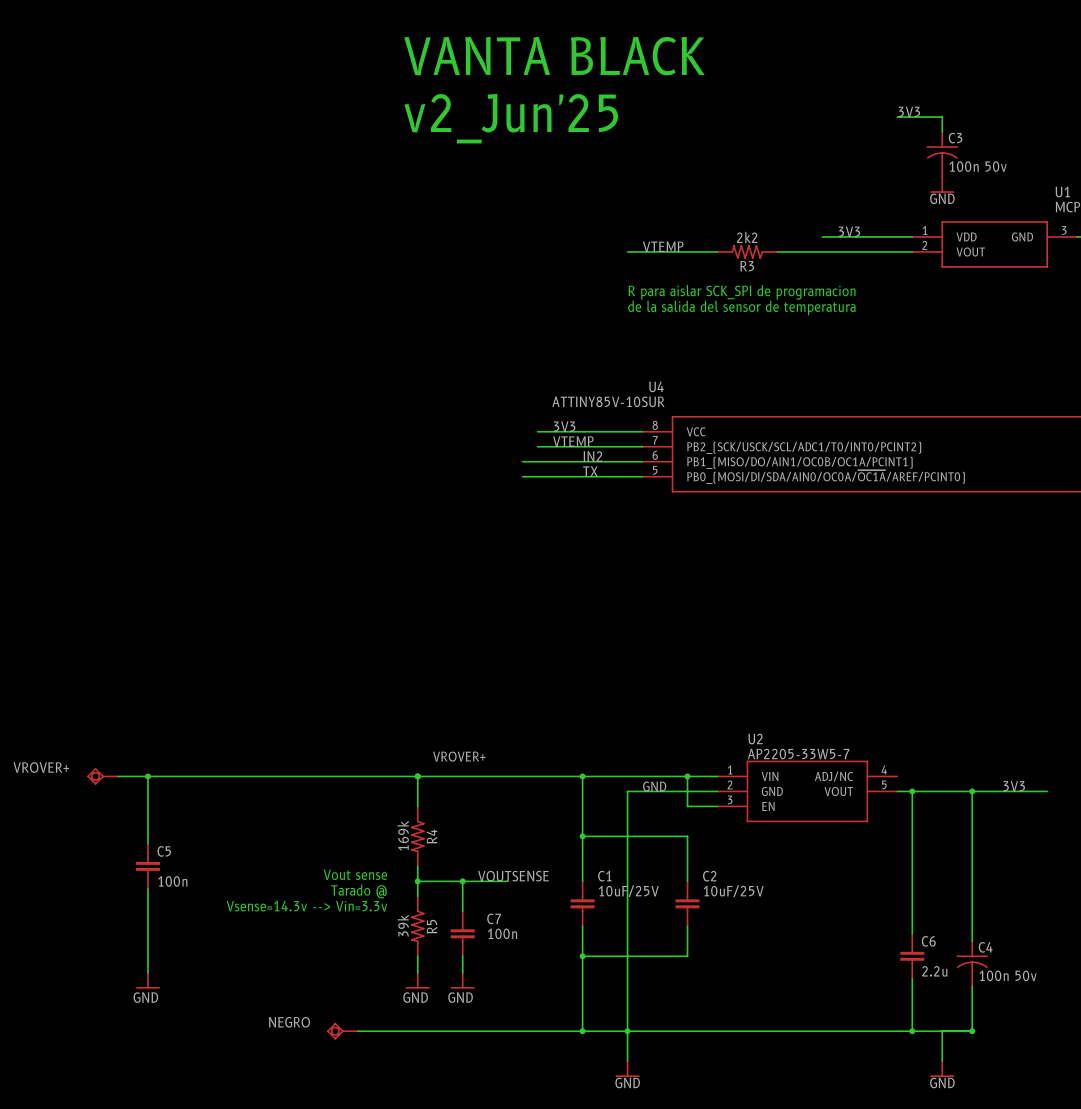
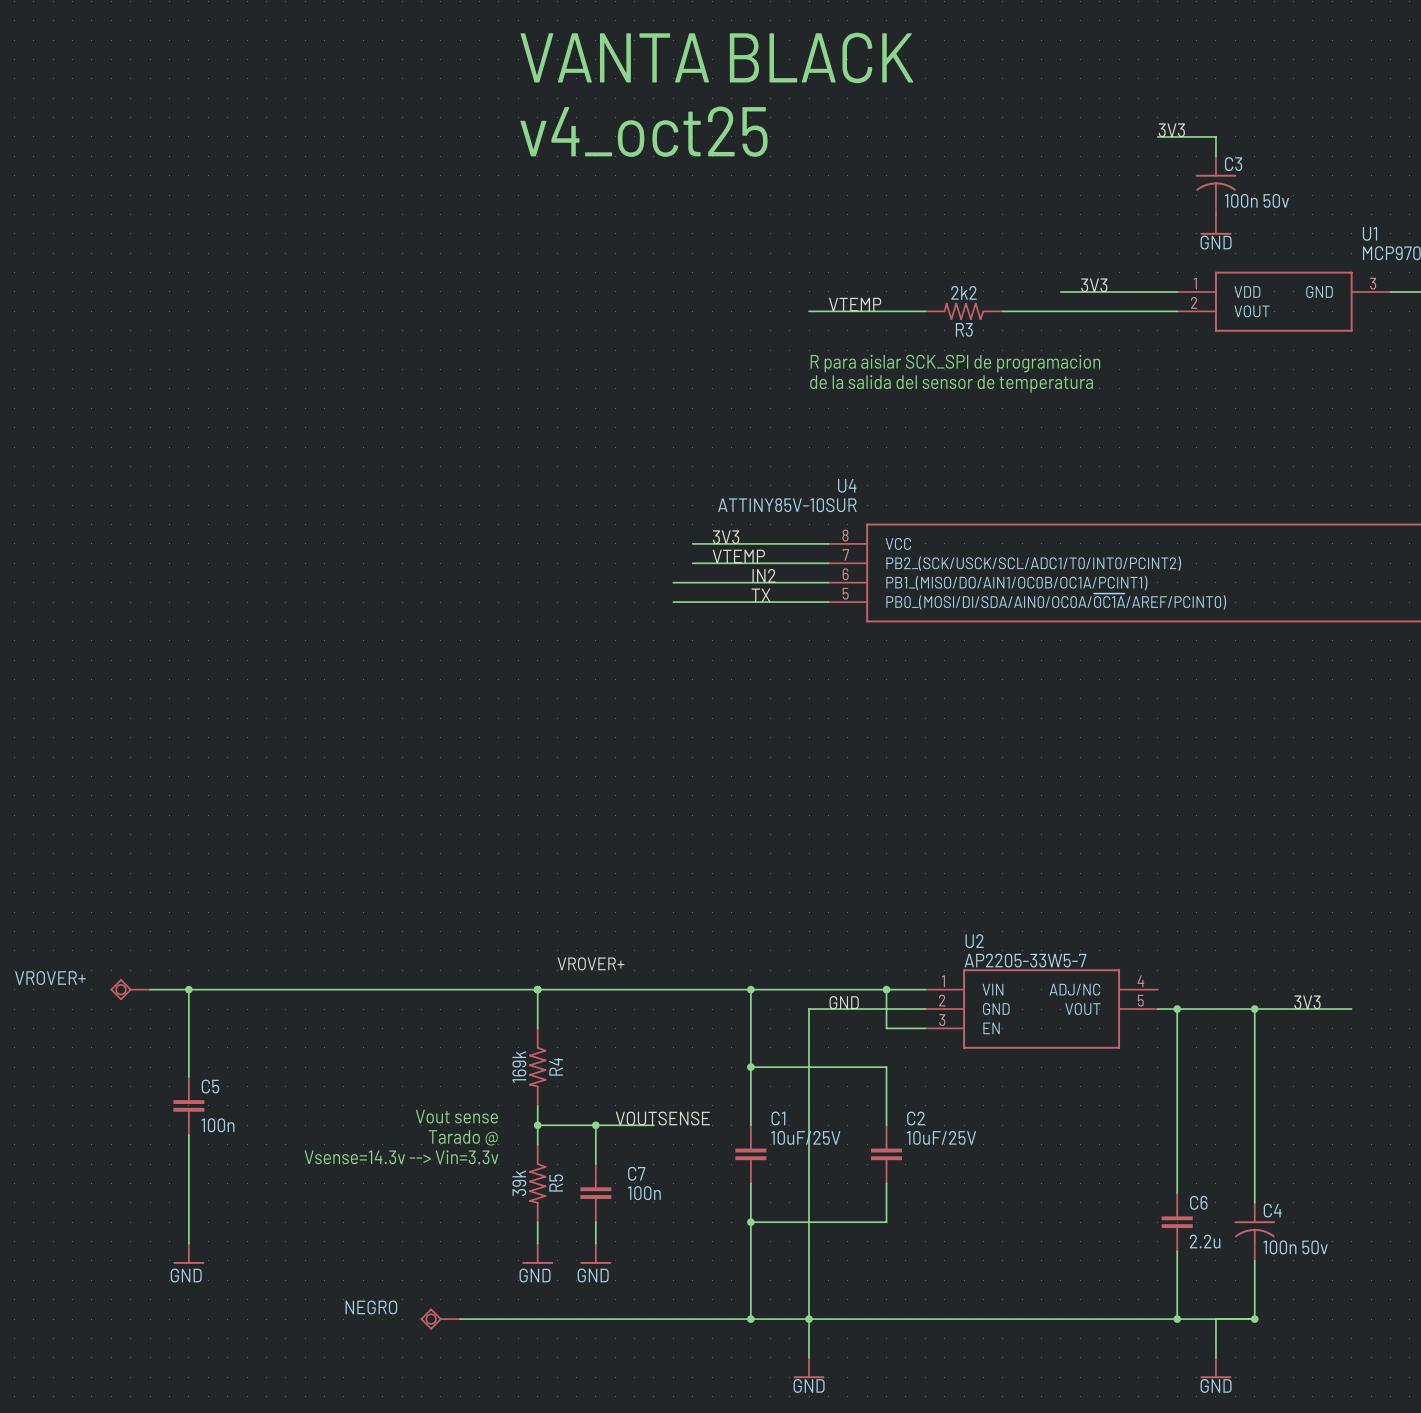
text: v2_Jun'25 (511, 118) -> v4_oct25 (643, 131)

